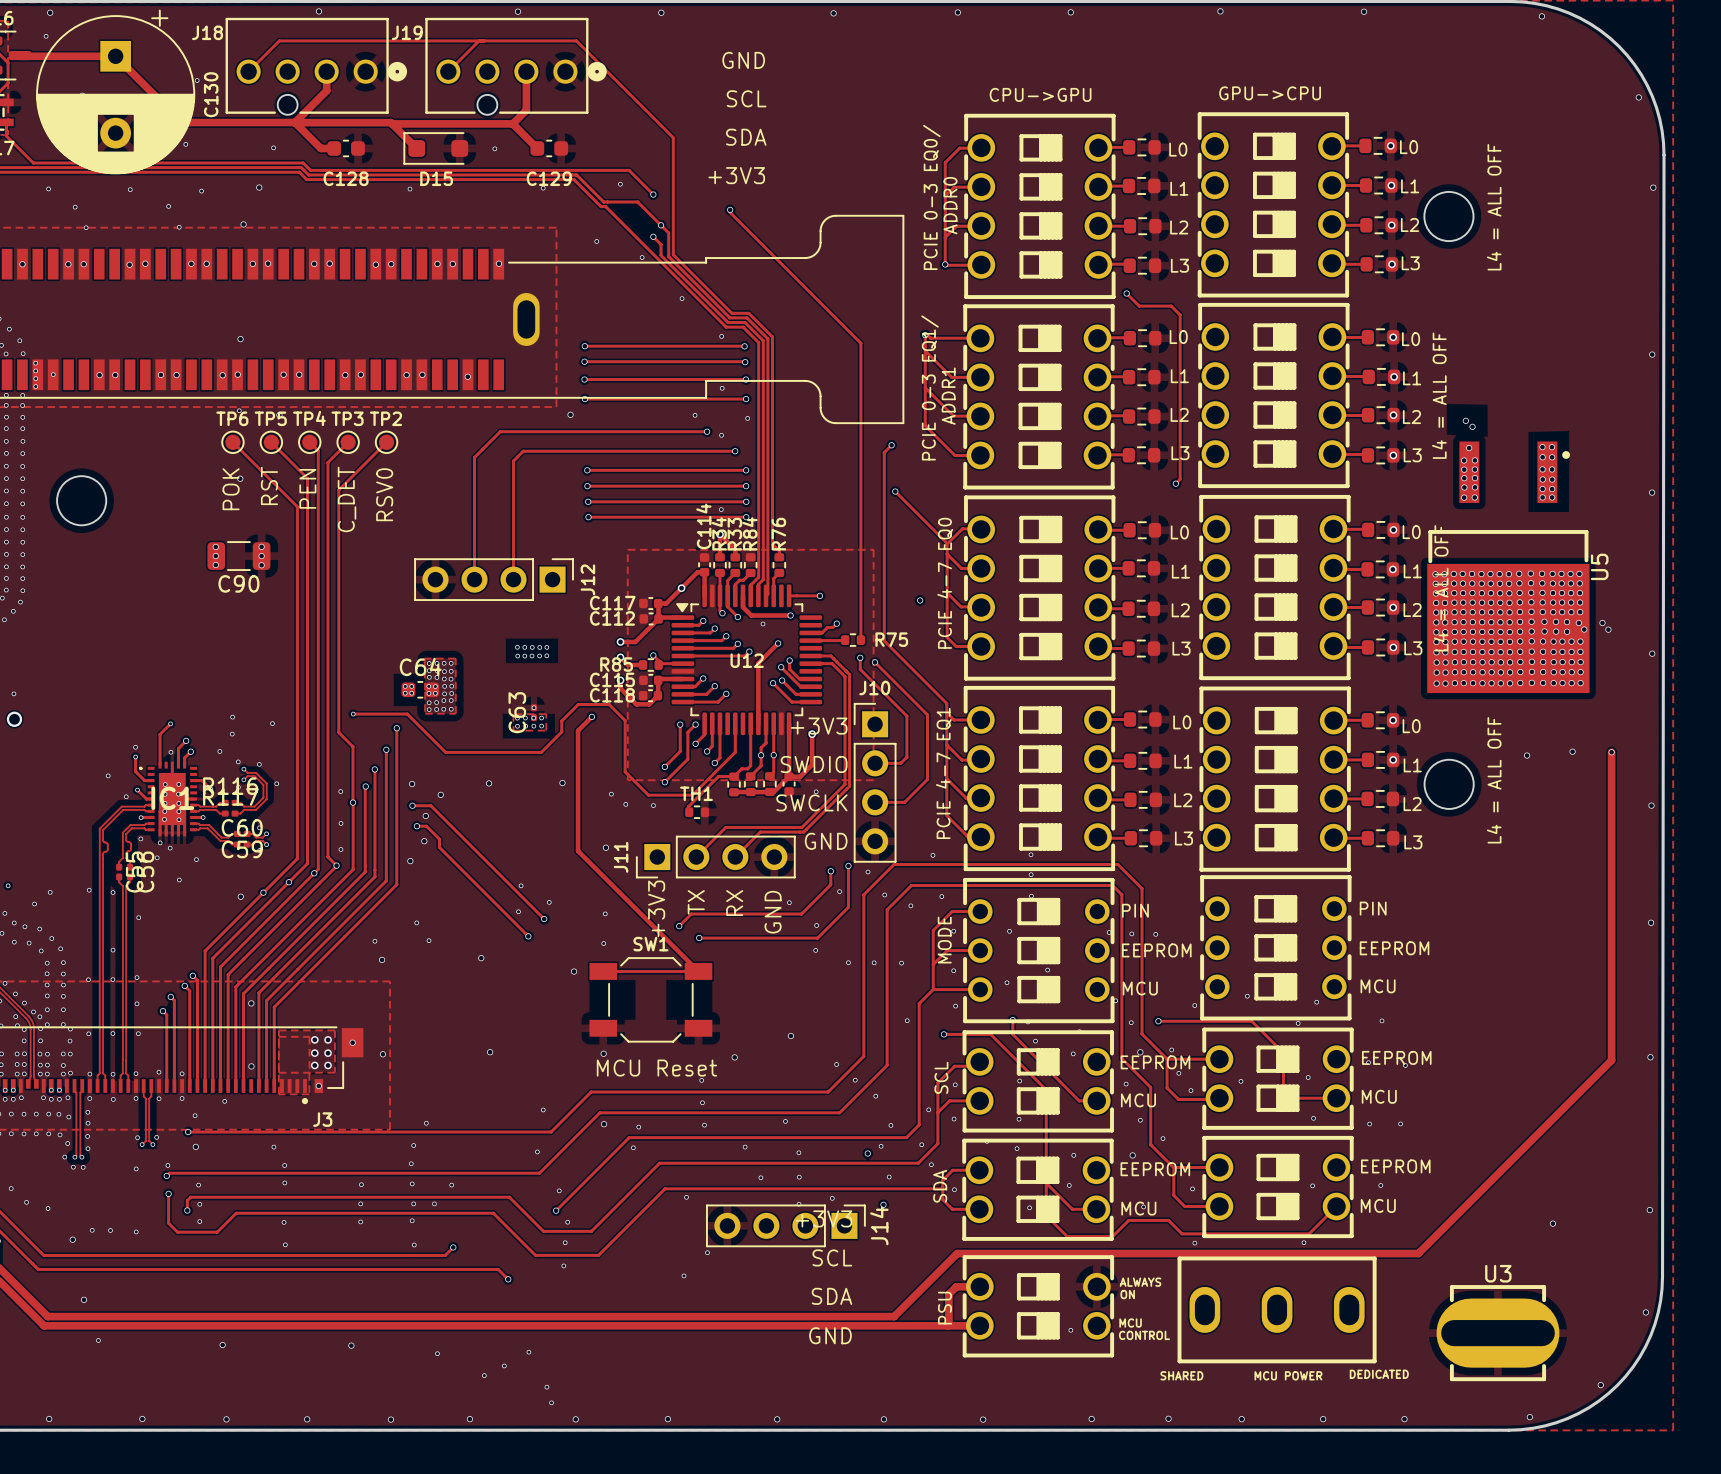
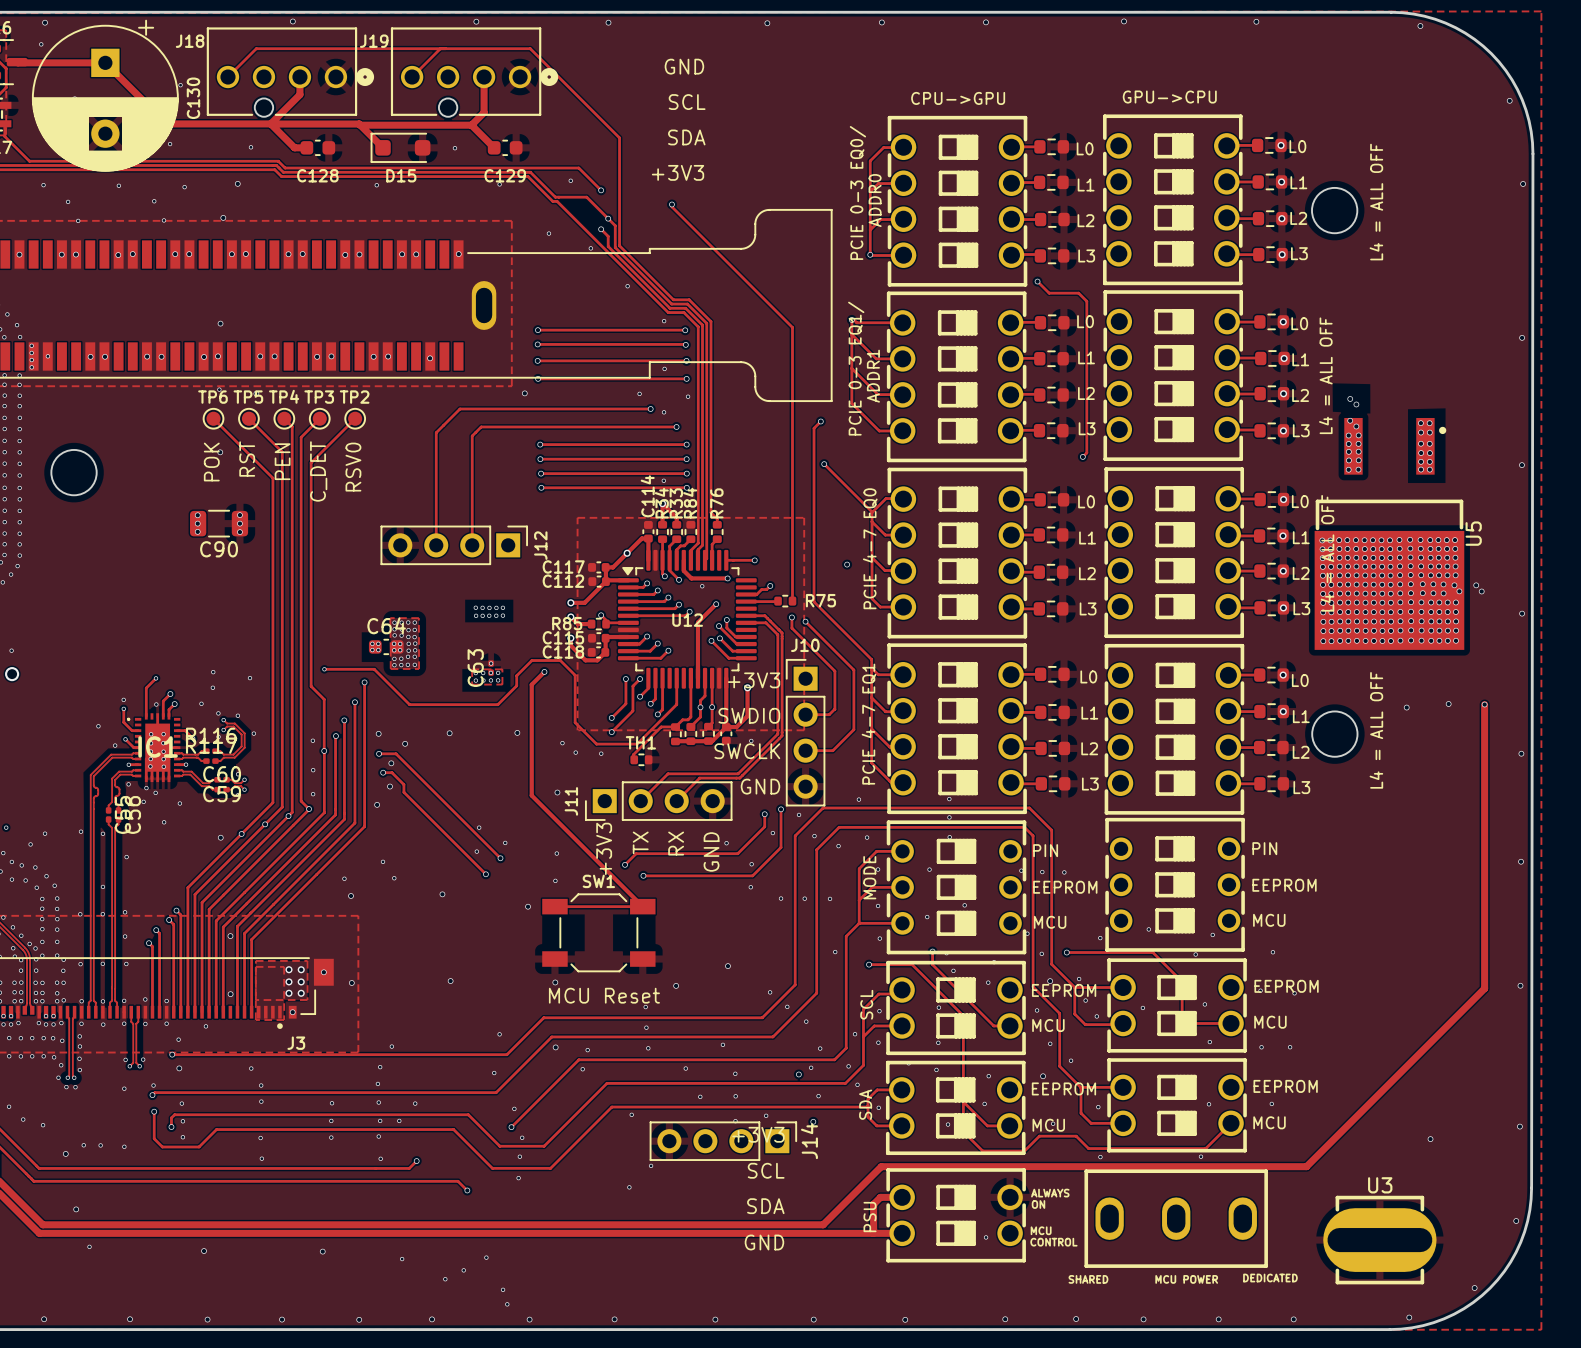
via: none -> (1350, 420)
via: (1469, 448) -> none
via: none -> (1356, 426)

